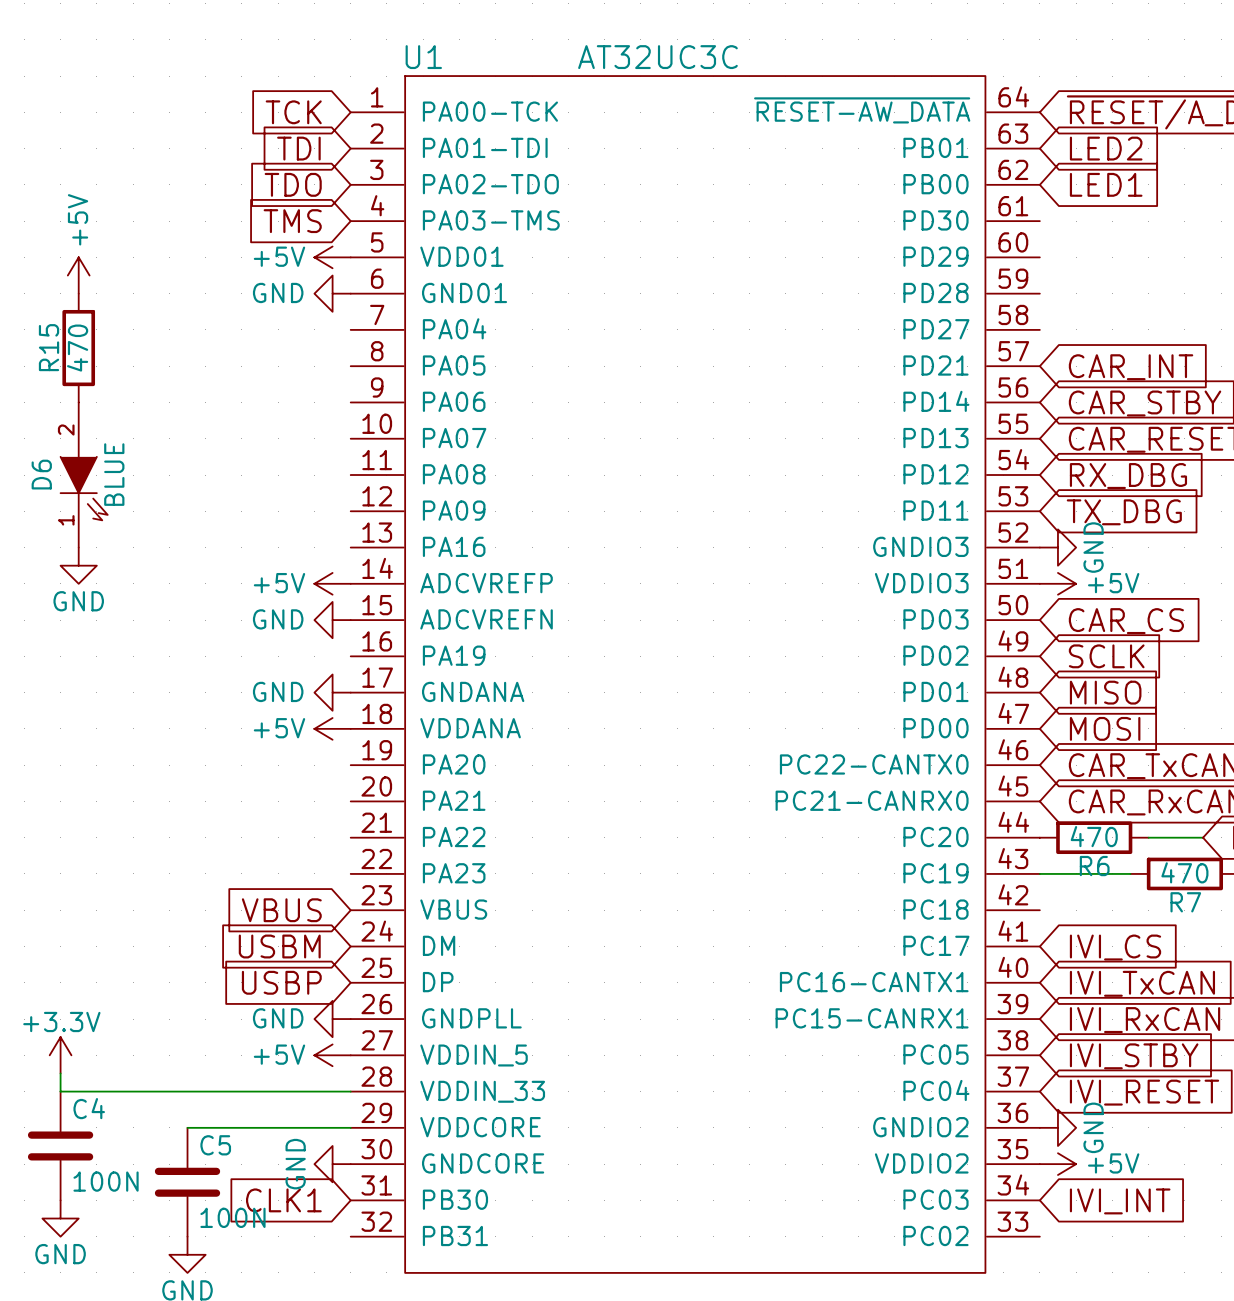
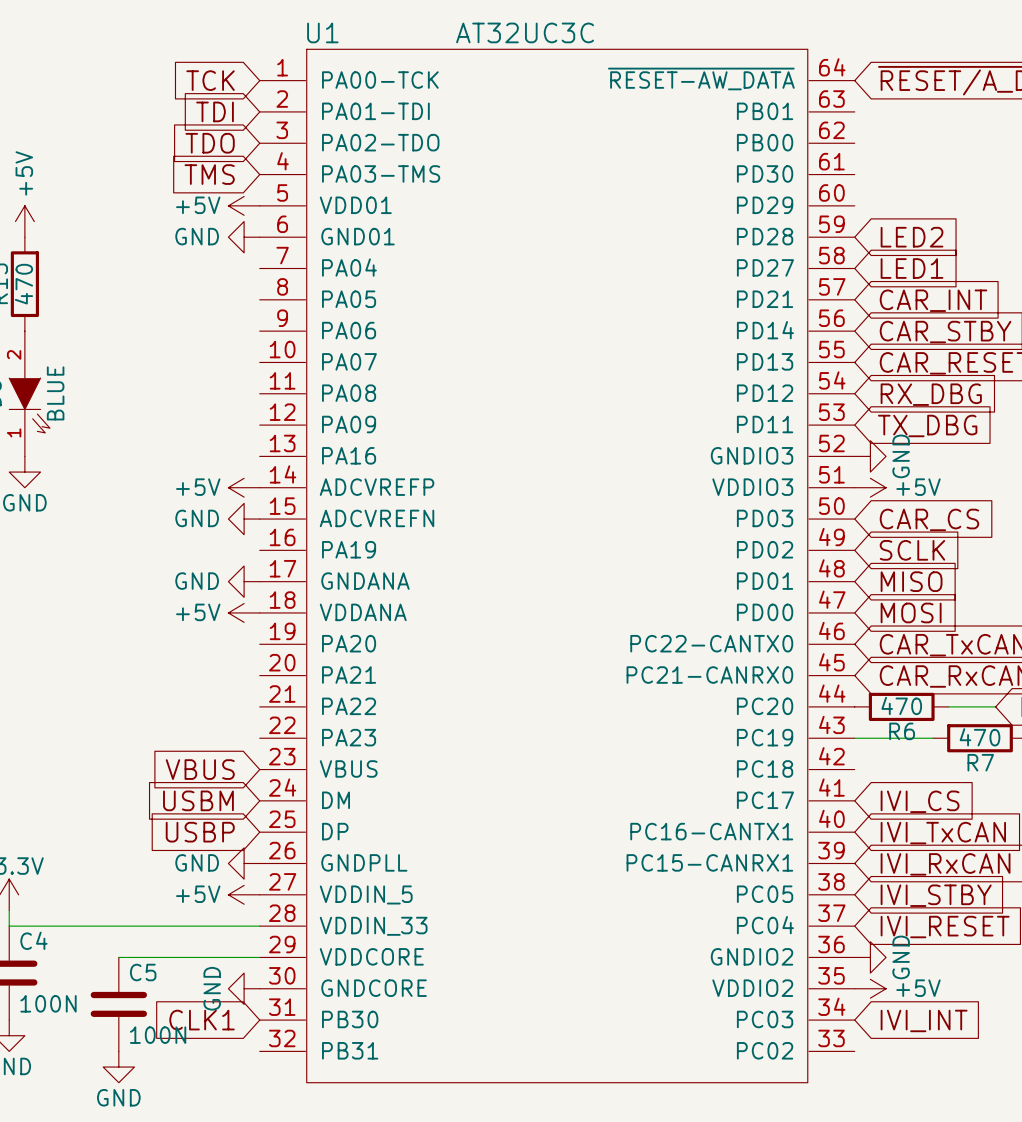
global label position: LED2 (1106, 148) -> LED2 (912, 237)
global label position: LED1 (1106, 184) -> LED1 (912, 268)

